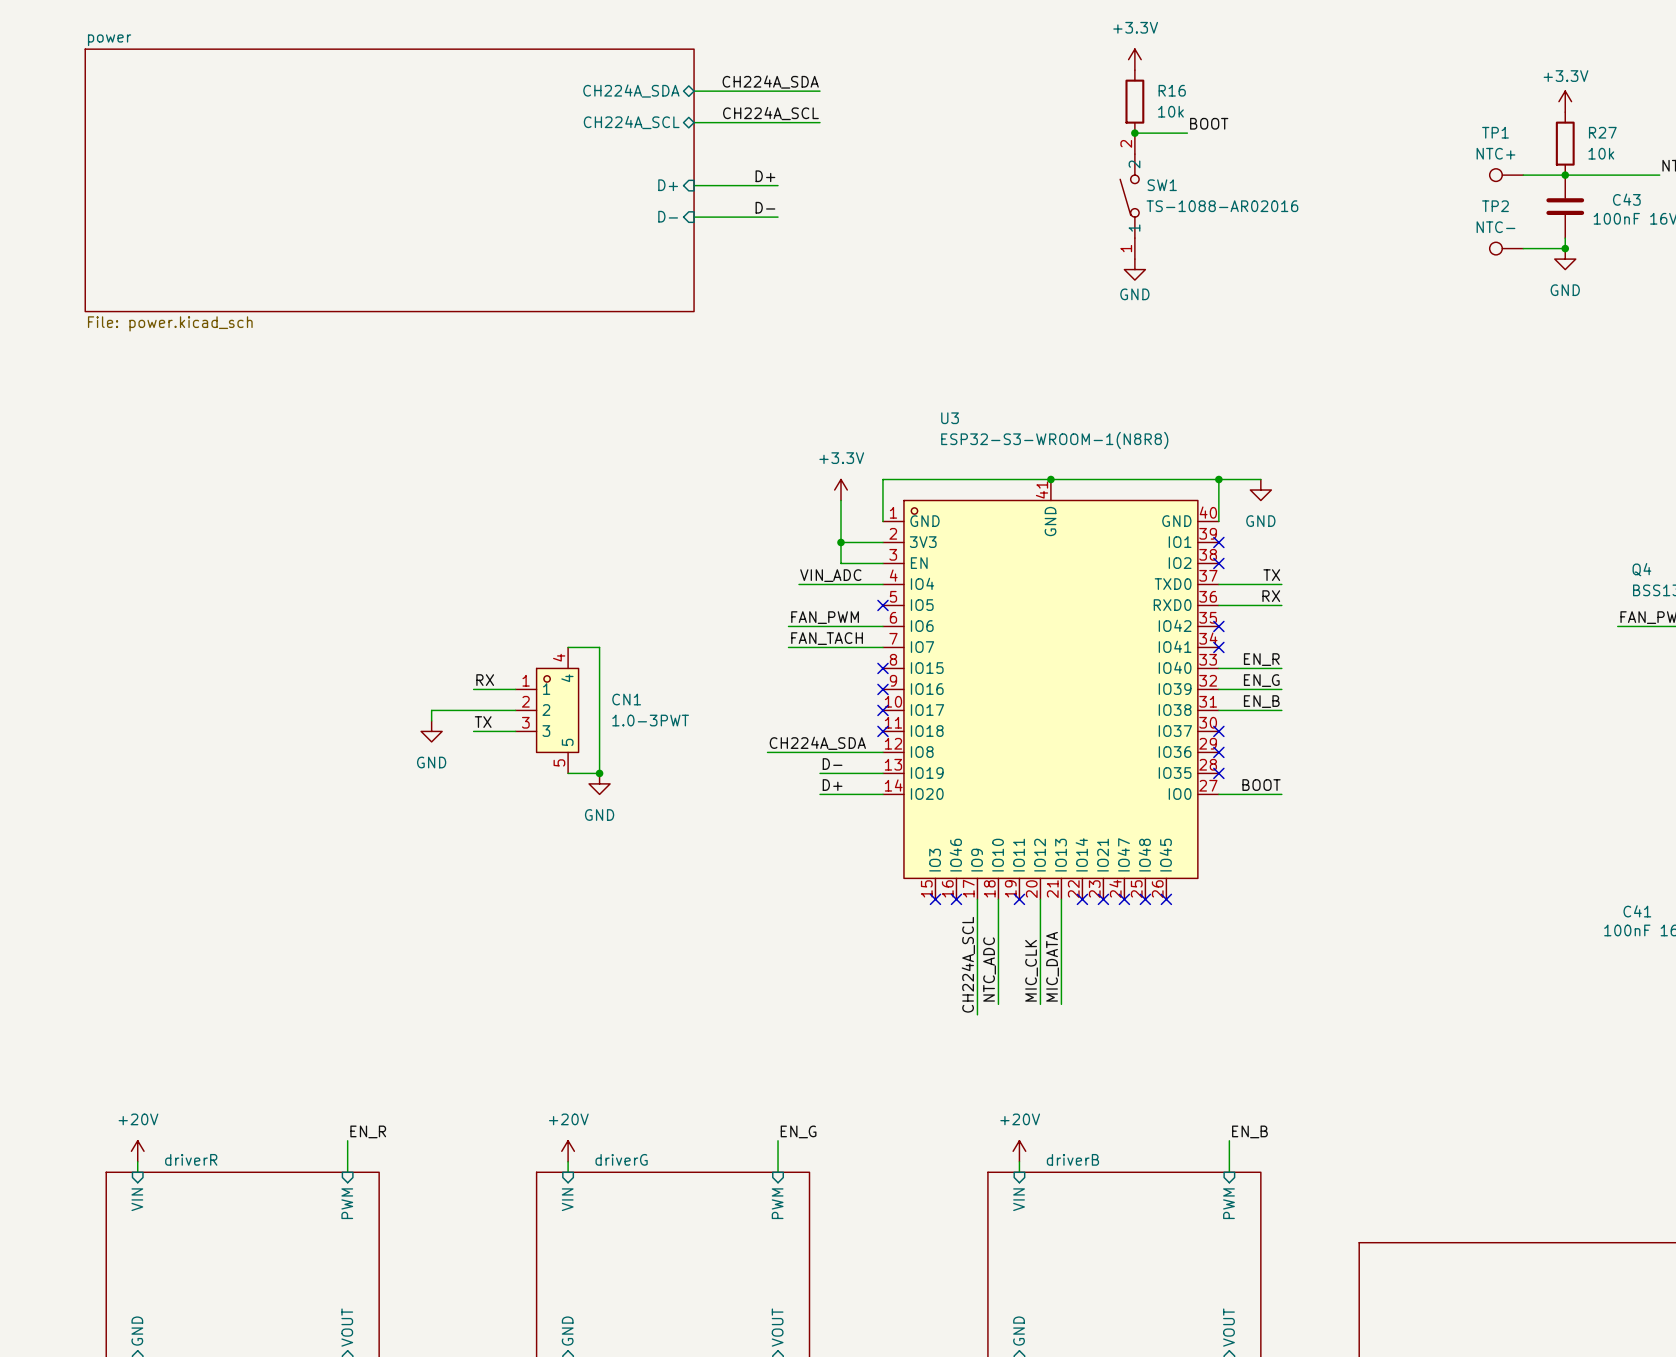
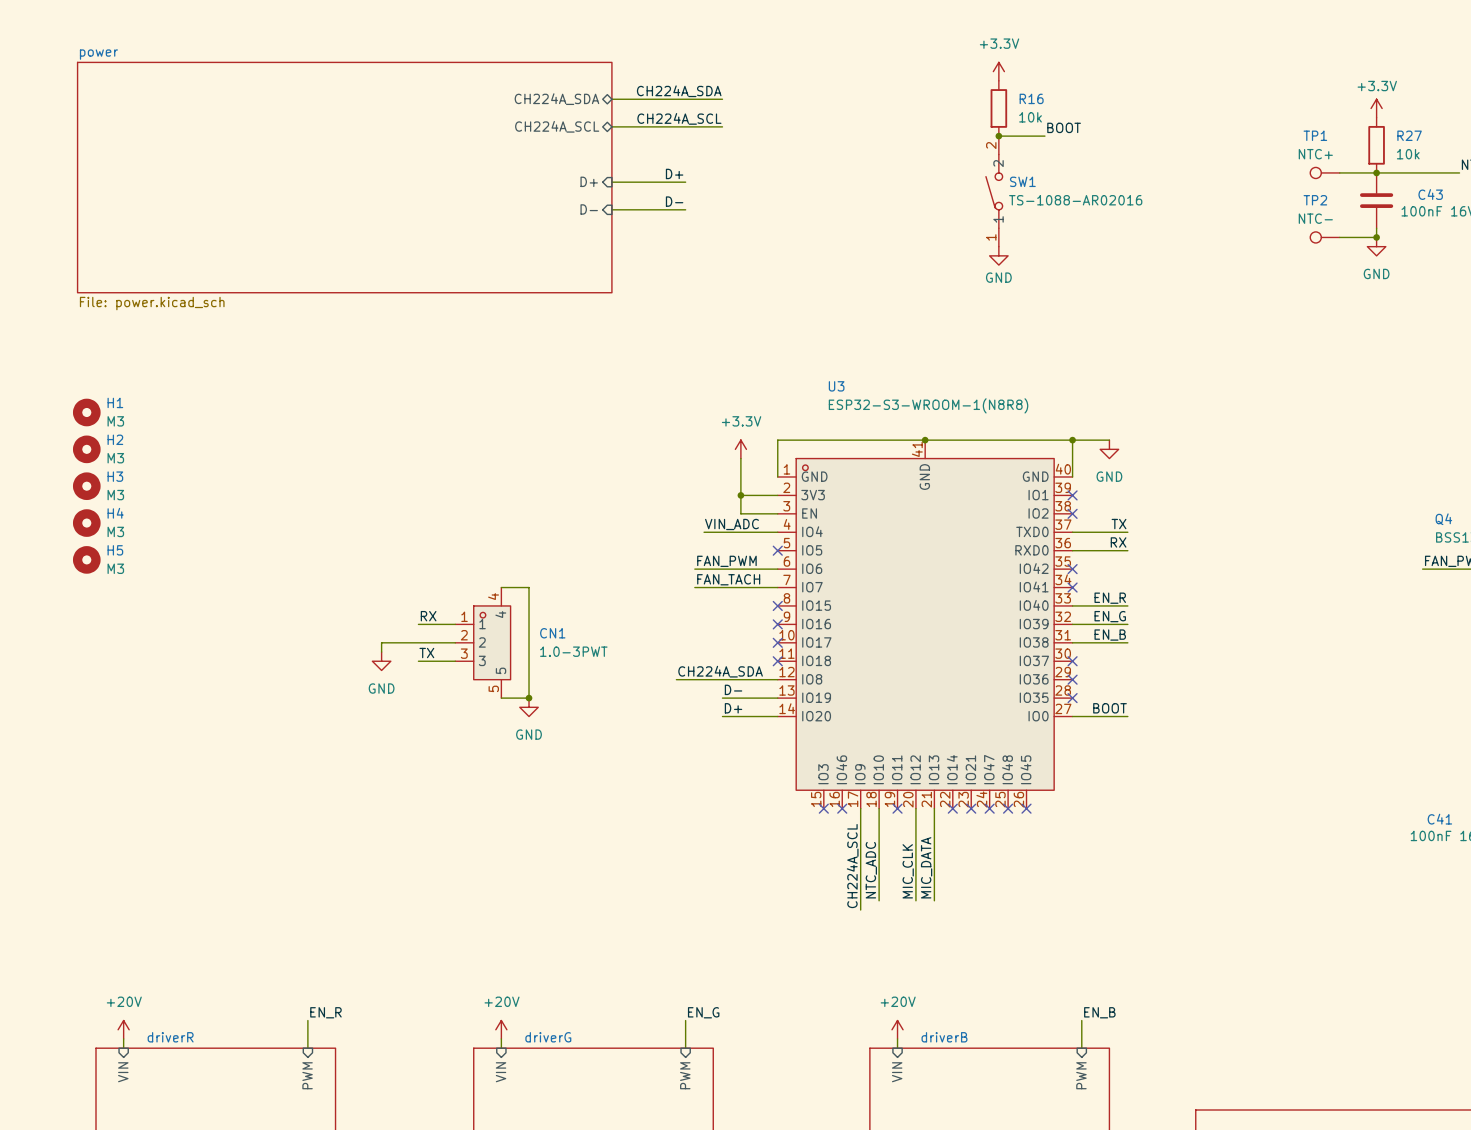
H1: none -> M3 (86, 412)
H2: none -> M3 (86, 449)
H3: none -> M3 (86, 486)
H4: none -> M3 (86, 523)
H5: none -> M3 (86, 559)

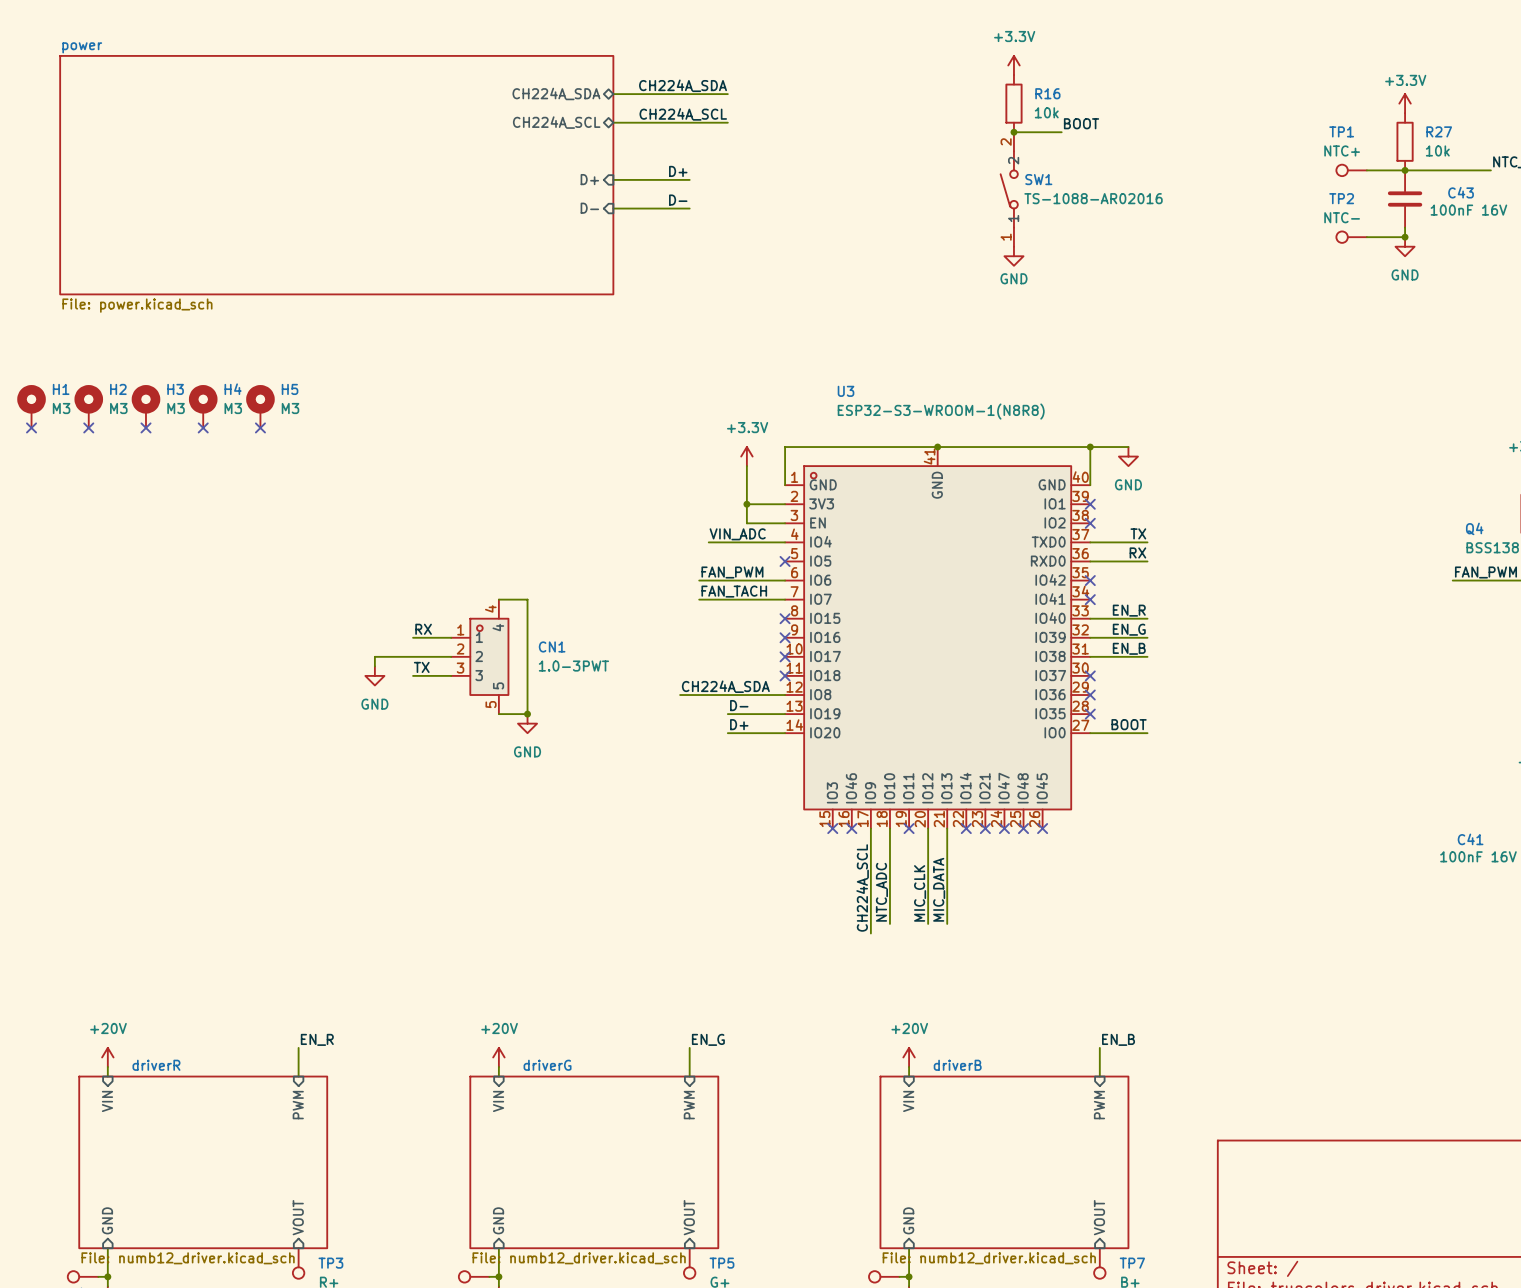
H1 symbol: [72, 398, 101, 427] -> [17, 385, 46, 428]
no-connect mark: none -> (31, 427)
no-connect mark: none -> (88, 427)
no-connect mark: none -> (145, 427)
no-connect mark: none -> (203, 427)
no-connect mark: none -> (260, 427)
H2 symbol: [72, 435, 101, 464] -> [74, 385, 104, 428]
H3 symbol: [72, 472, 101, 501] -> [131, 385, 161, 428]
H4 symbol: [72, 509, 101, 537] -> [188, 385, 218, 428]
H5 symbol: [72, 546, 101, 574] -> [246, 385, 275, 428]

